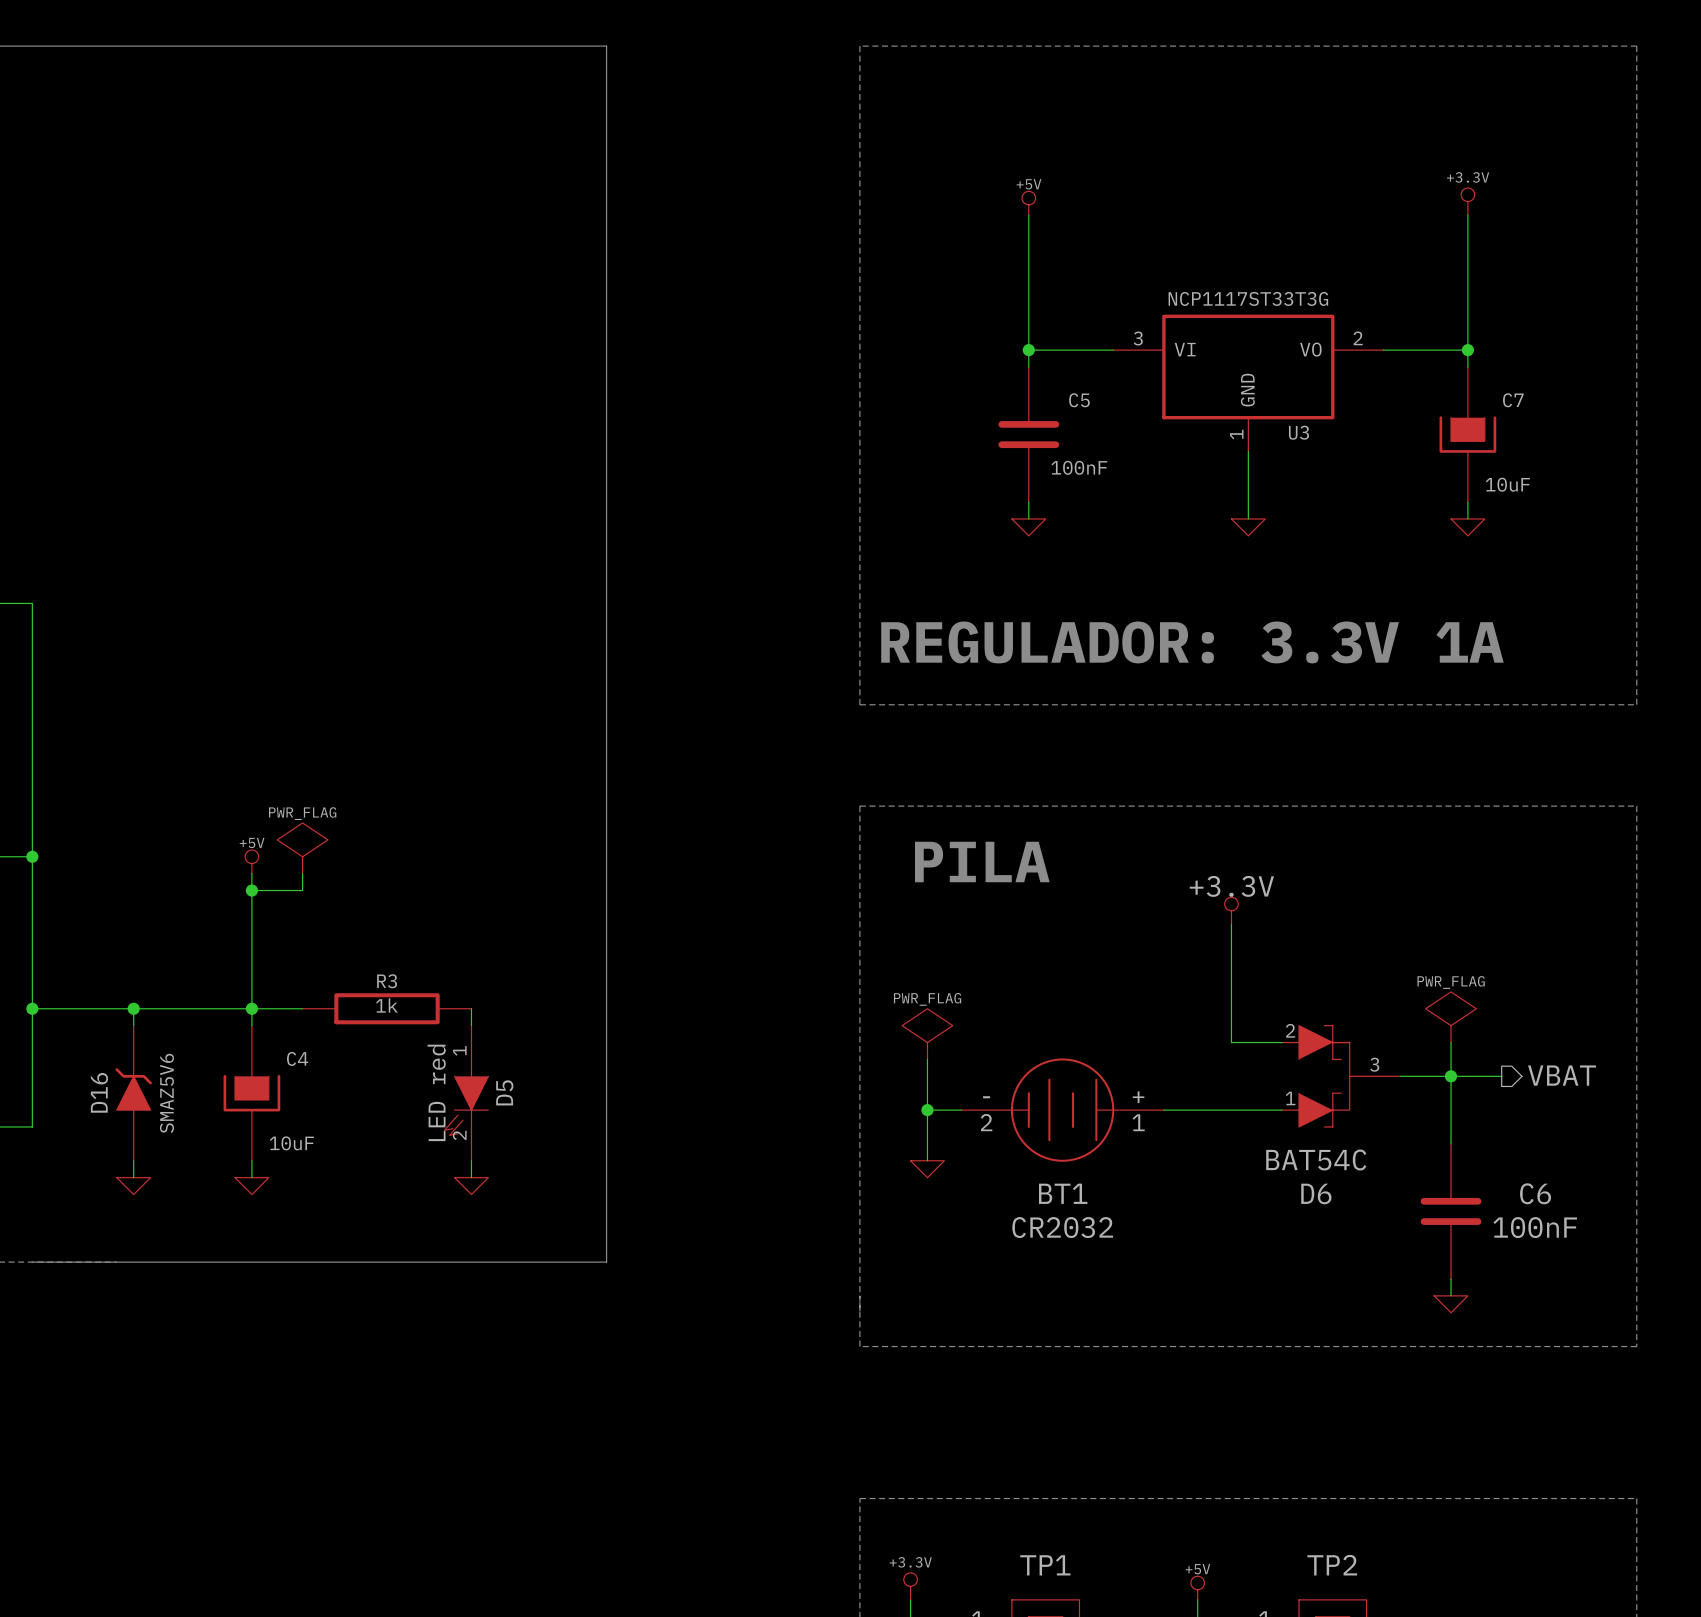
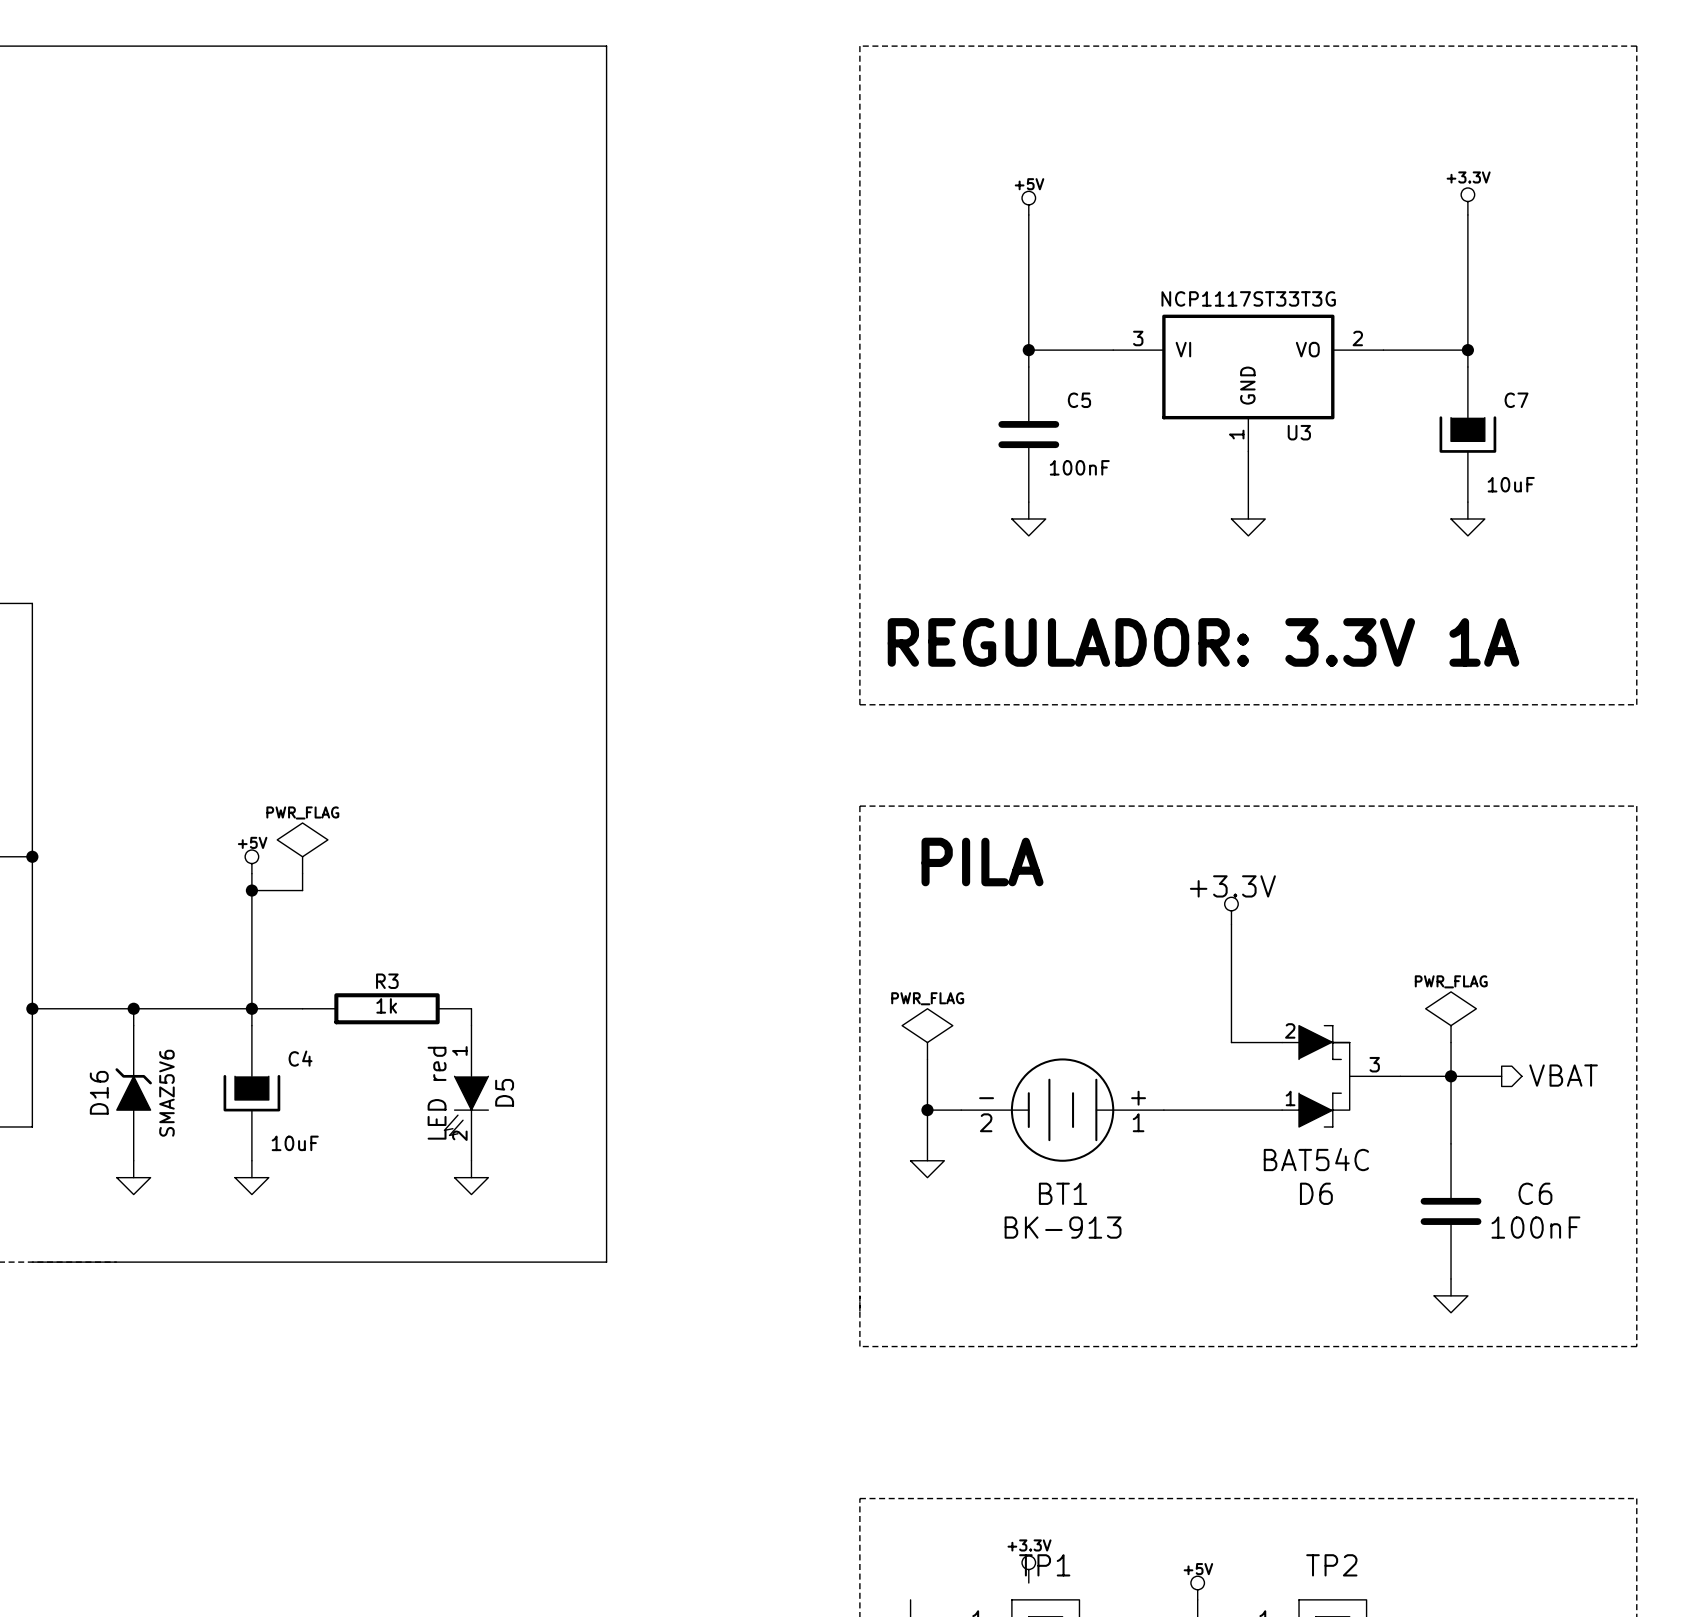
BT1 value: CR2032 (1062, 1227) -> BK-913 (1063, 1227)
power symbol position: +3.3V (910, 1586) -> +3.3V (1028, 1569)

